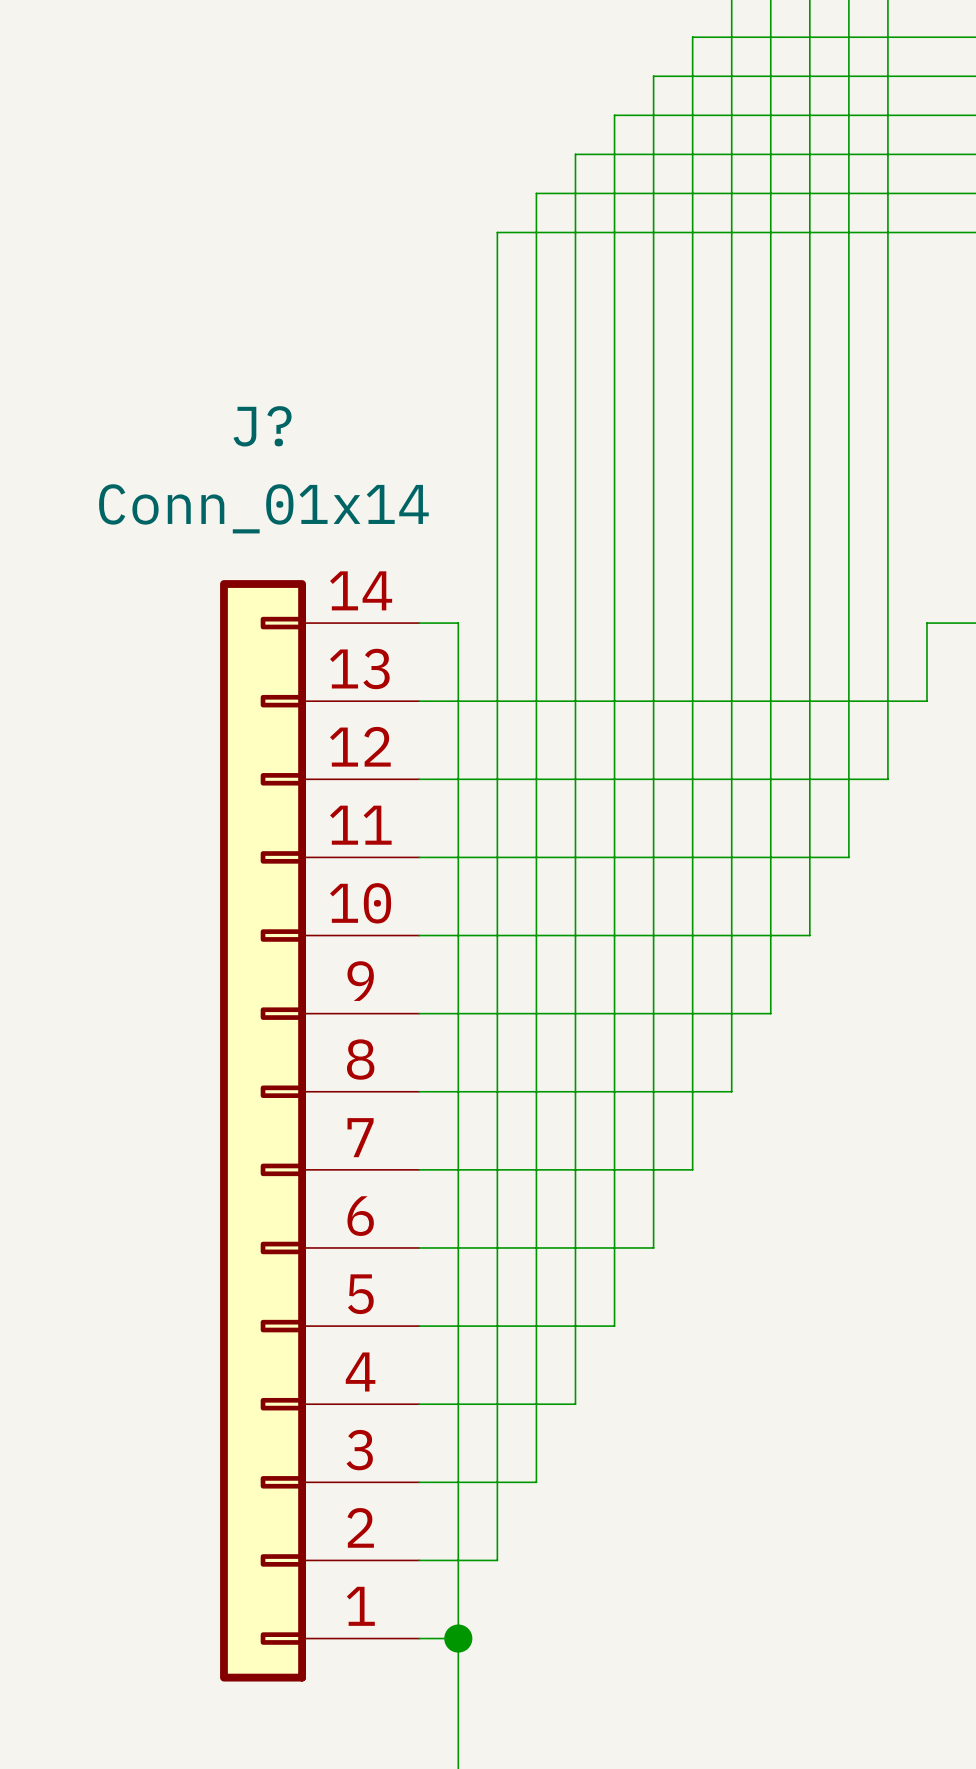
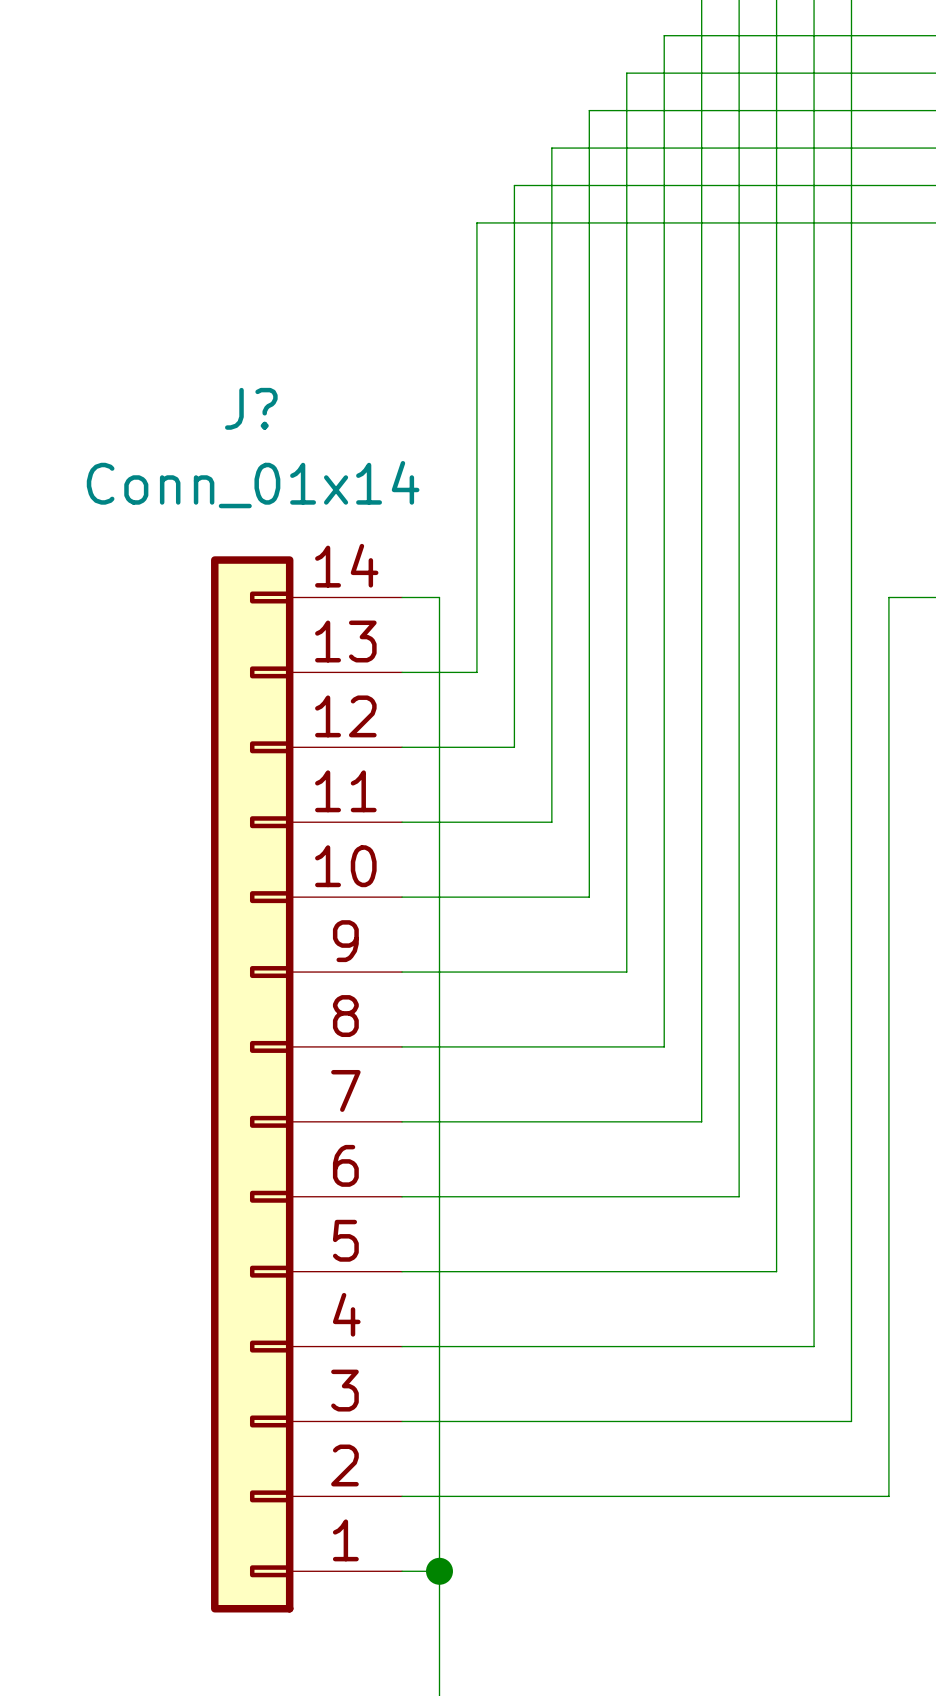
wire: (926, 701) (497, 701) (497, 1560) -> (888, 672) (888, 1496) (476, 1496)
wire: (887, 779) (536, 779) (536, 1482) -> (851, 747) (851, 1421) (514, 1421)
wire: (848, 857) (575, 857) (575, 1404) -> (814, 822) (814, 1346) (551, 1346)
wire: (809, 935) (614, 935) (614, 1326) -> (776, 897) (776, 1271) (589, 1271)
wire: (770, 1013) (653, 1013) (653, 1247) -> (739, 972) (739, 1196) (626, 1196)
wire: (731, 1091) (692, 1091) (692, 1169) -> (701, 1046) (701, 1121) (664, 1121)

